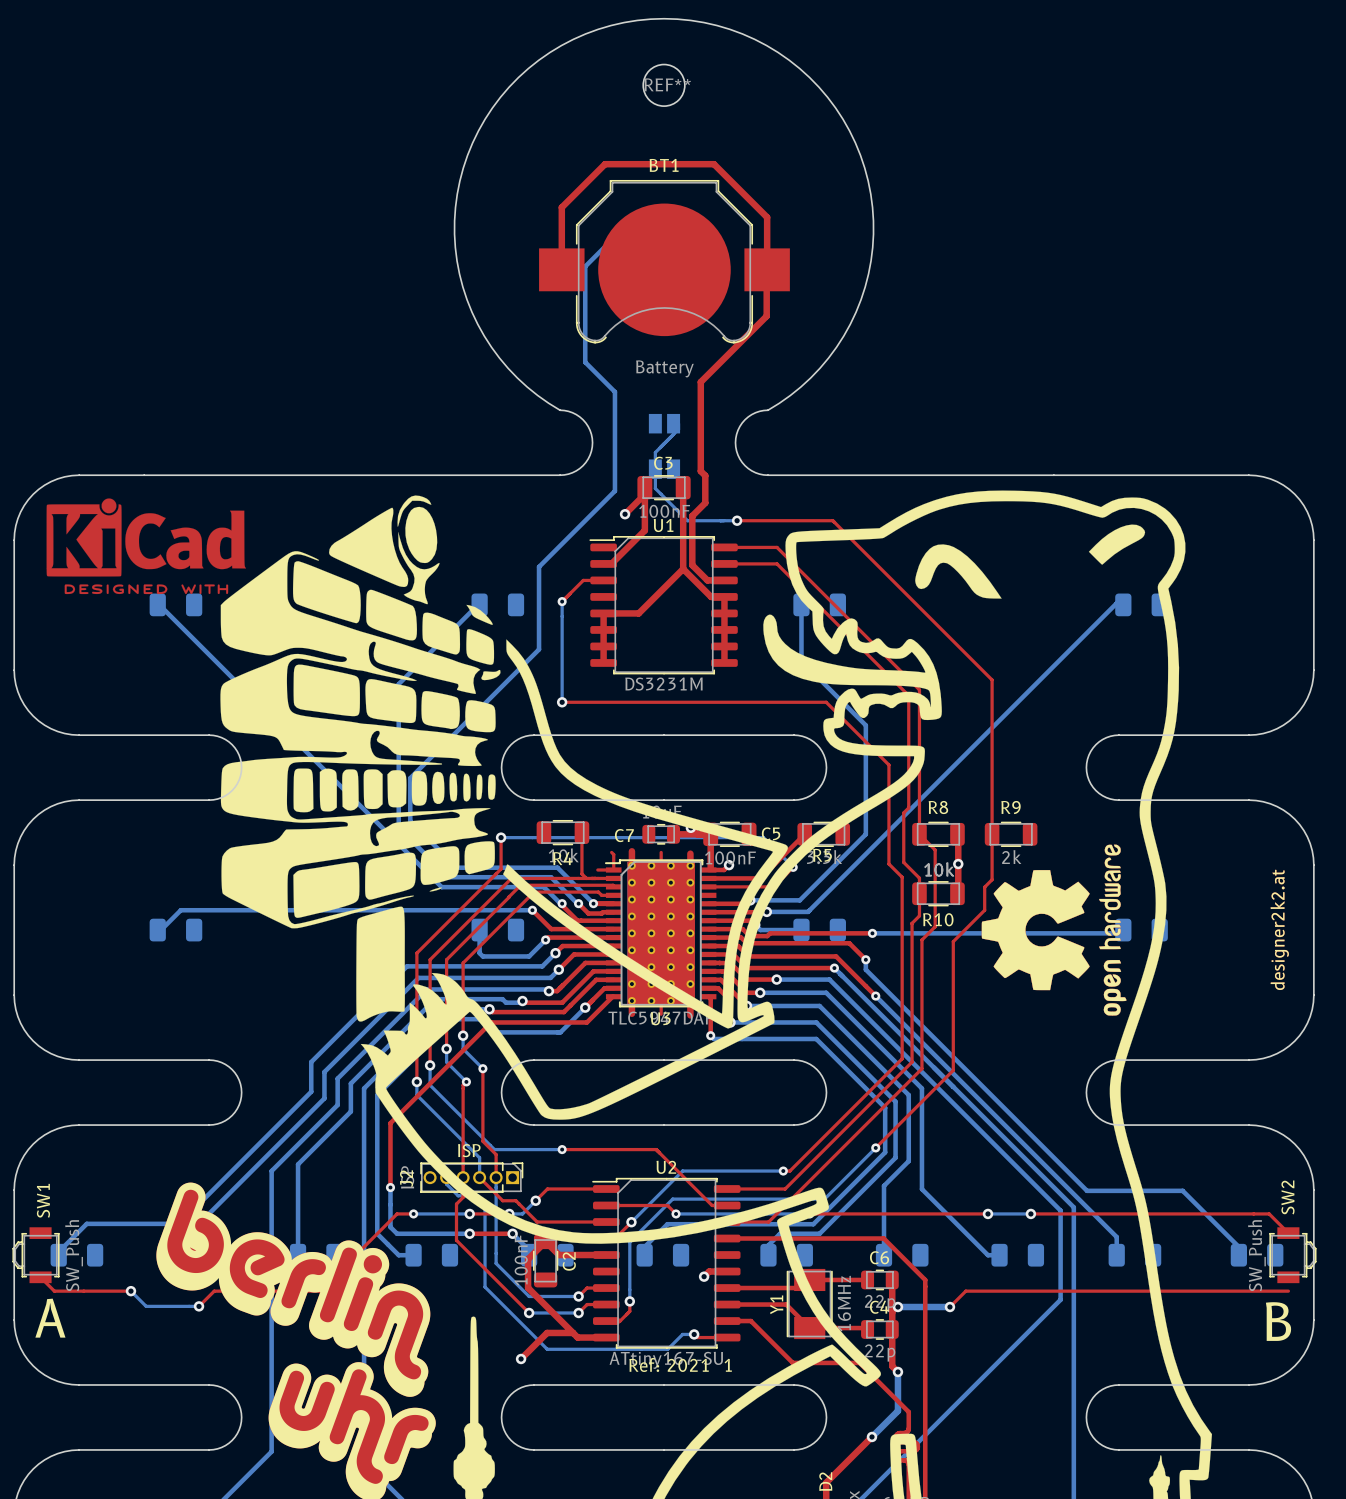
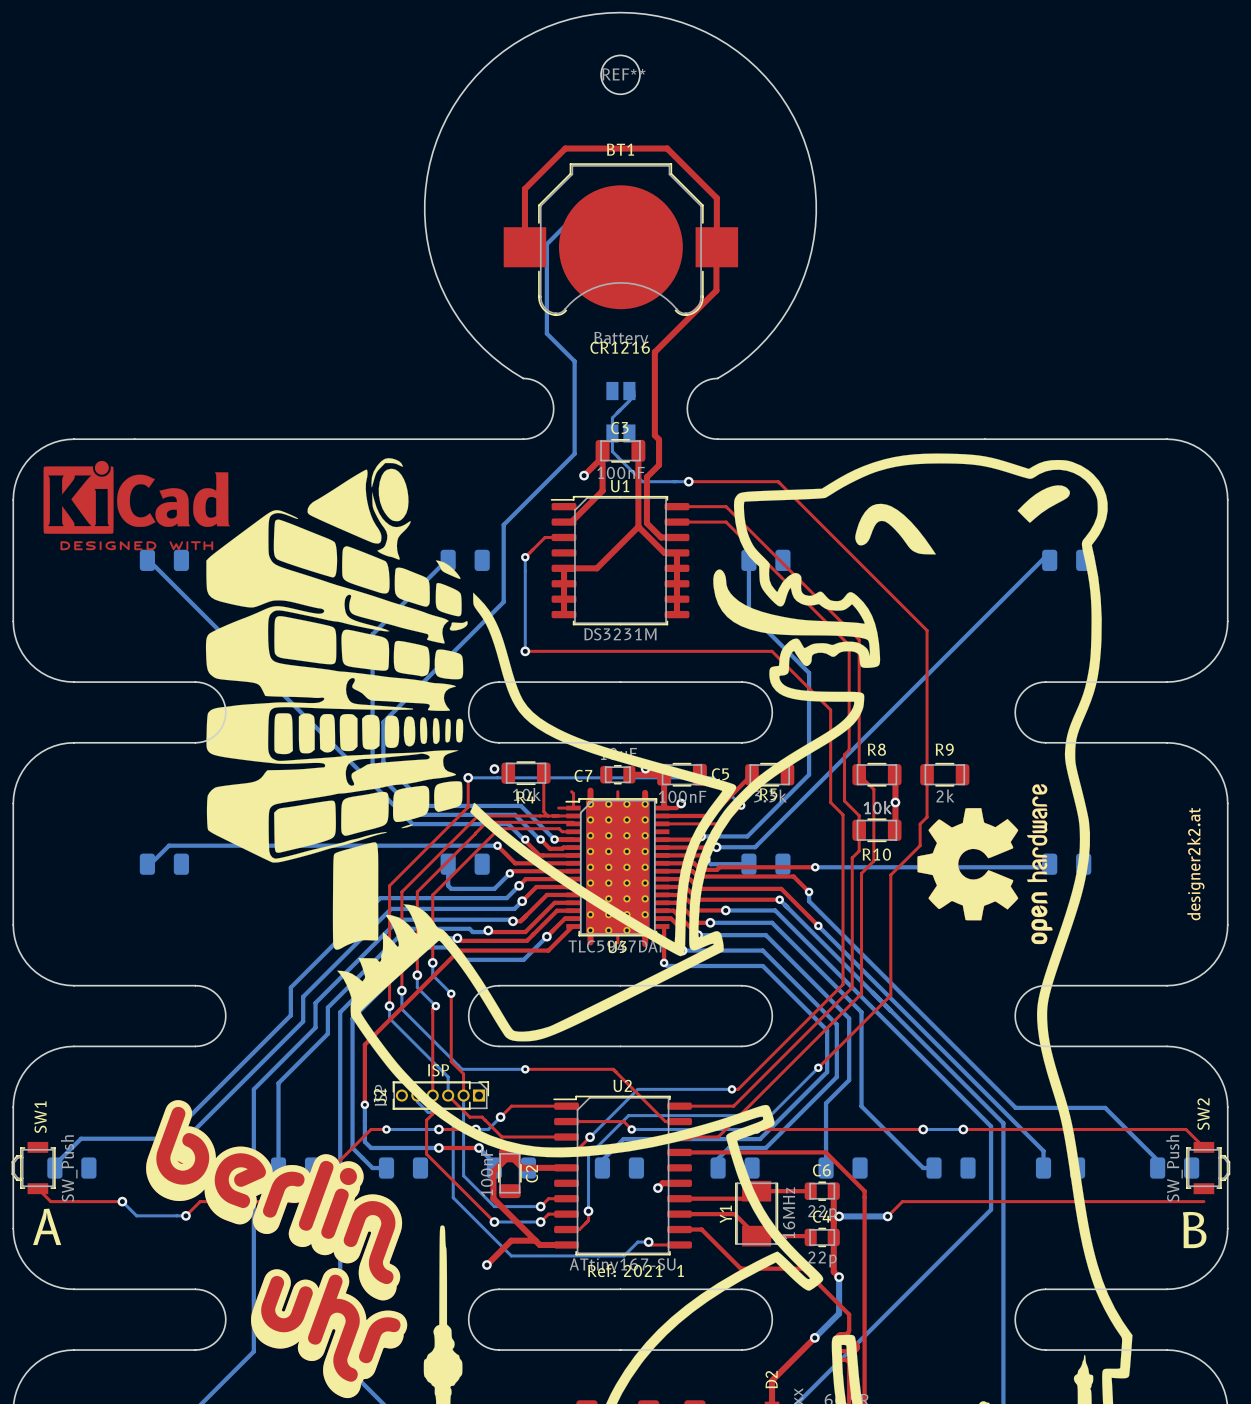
text: none -> CR1216 (620, 347)
via: none -> (494, 769)

